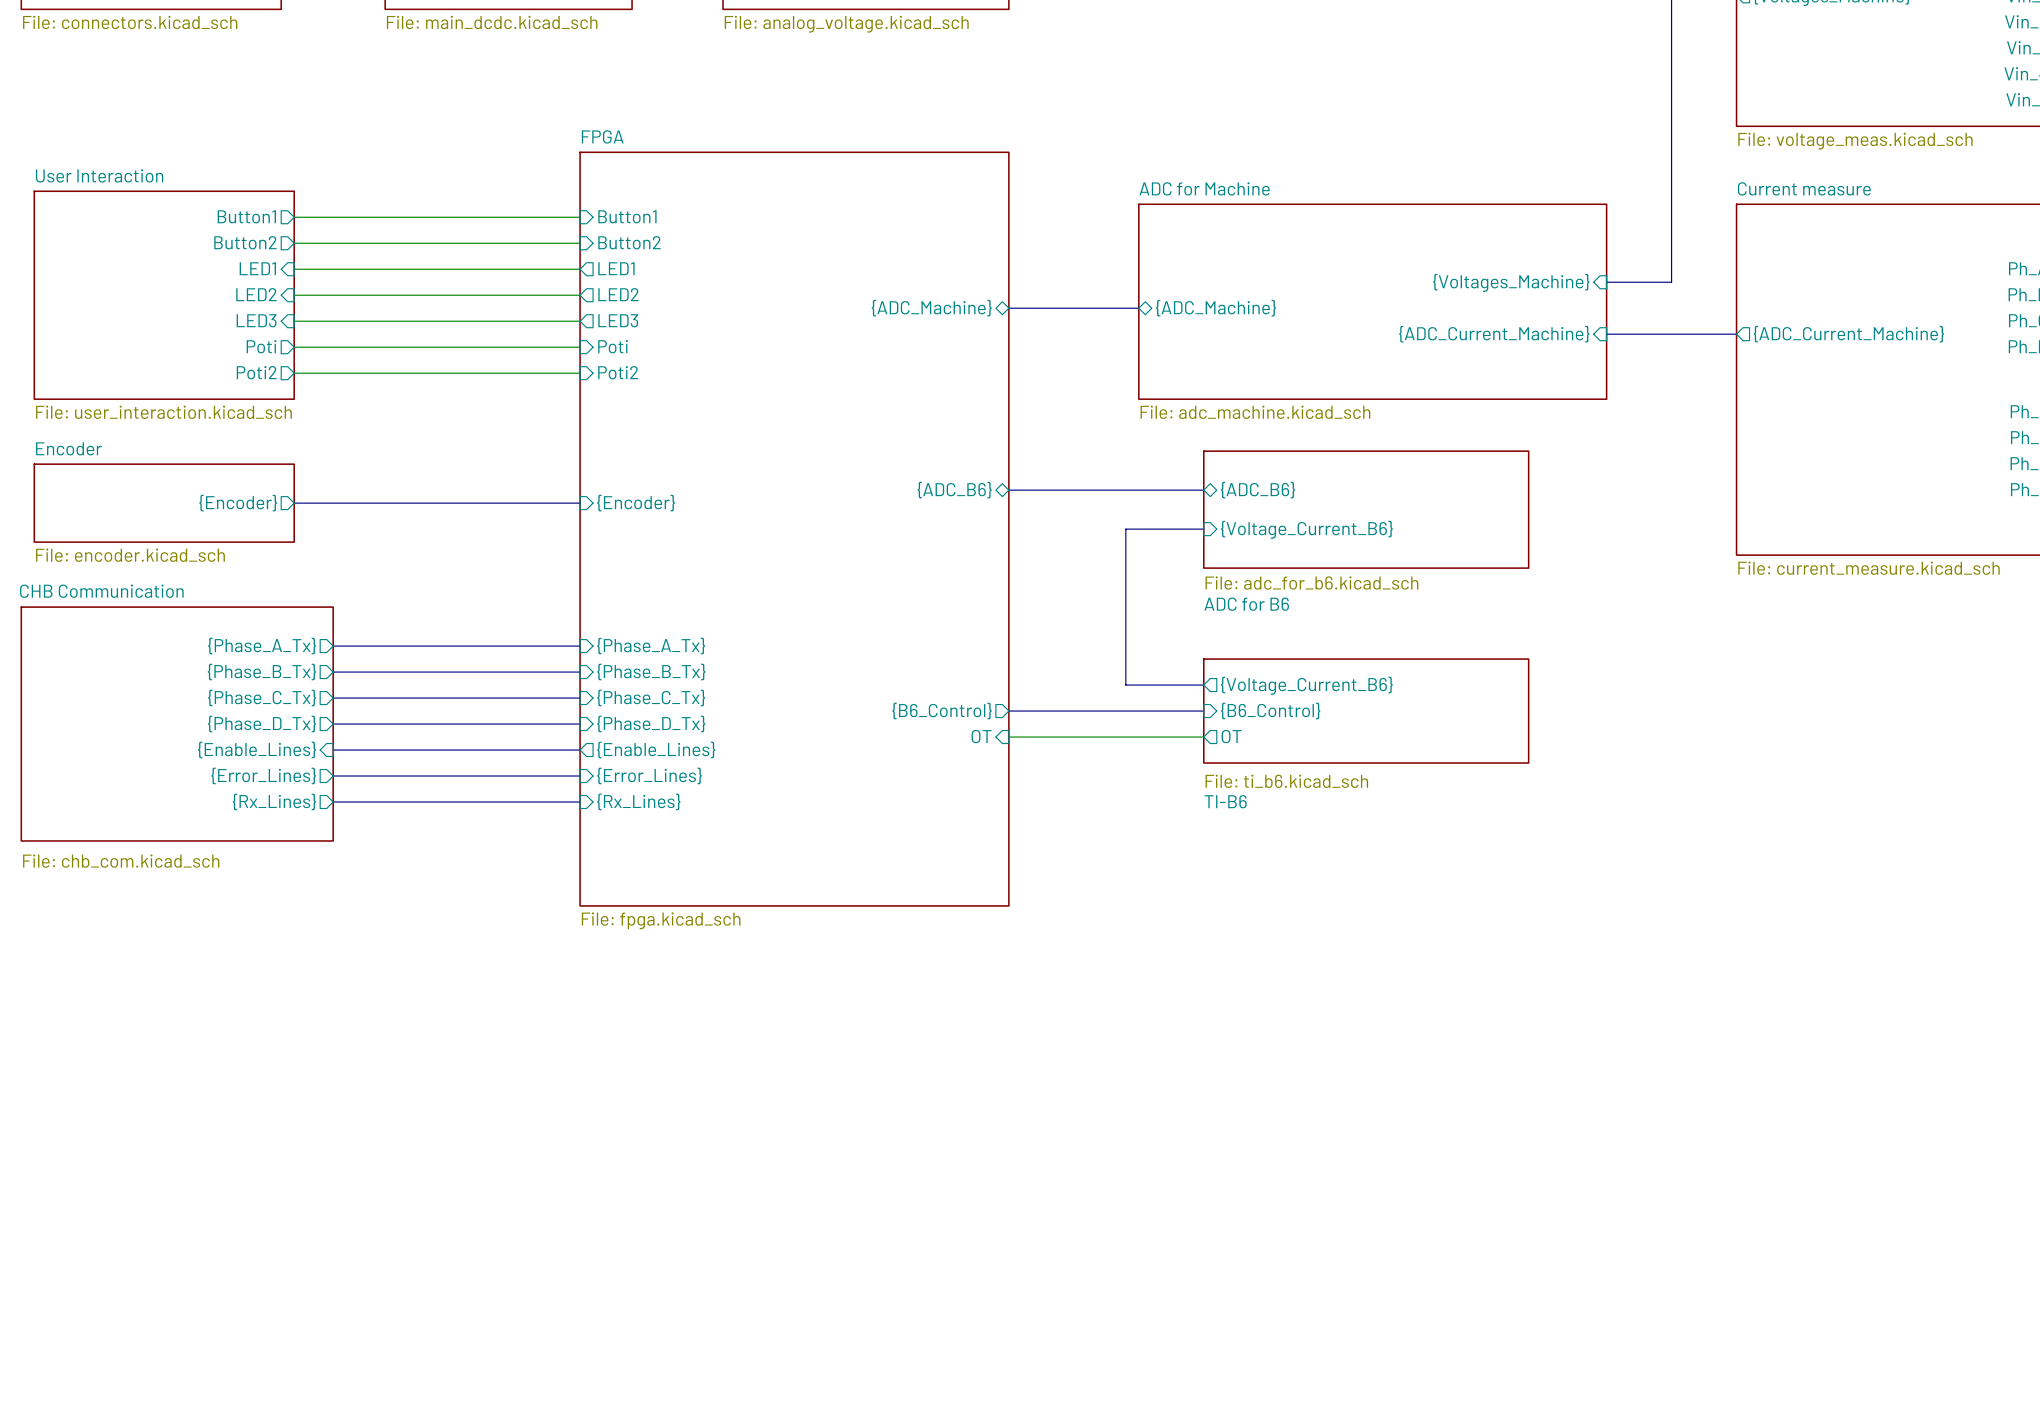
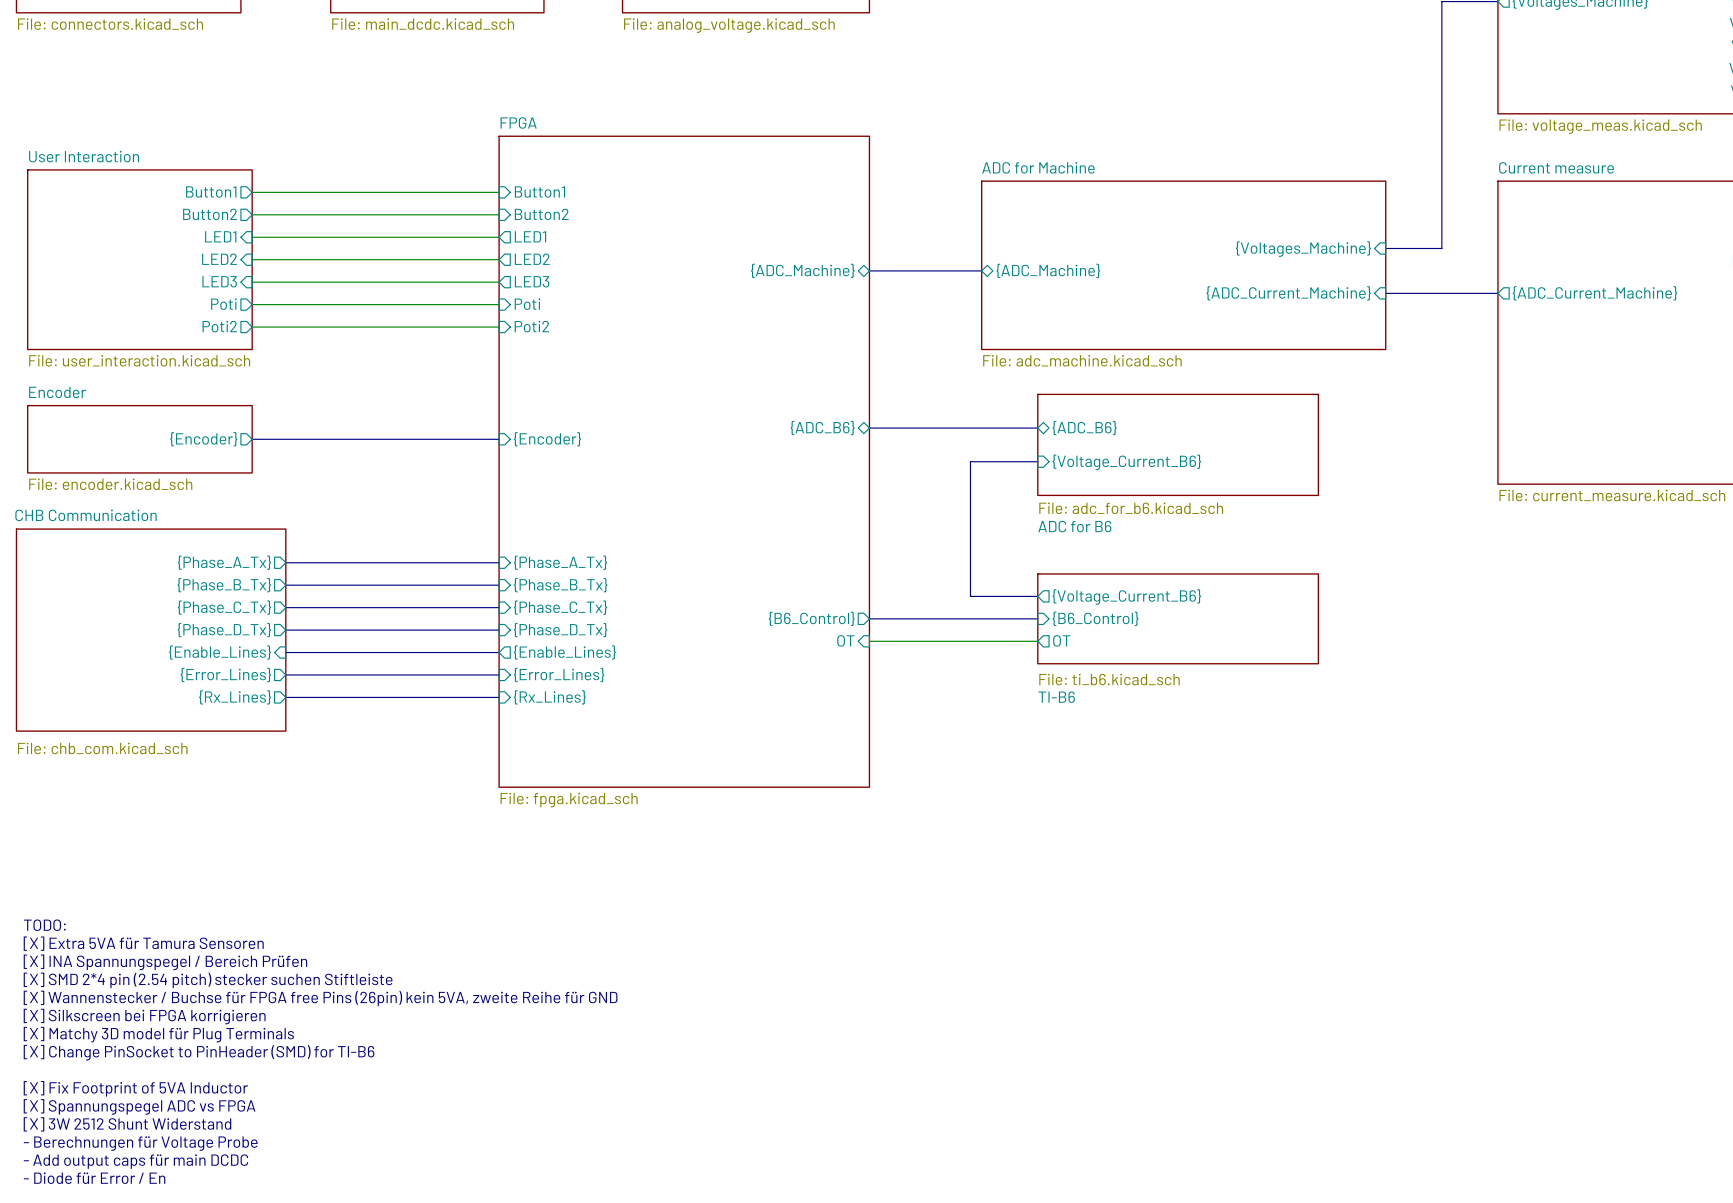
text: none -> TODO: (44, 925)
text: none -> [X] Extra 5VA für Tamura Sensoren (143, 943)
text: none -> [X] INA Spannungspegel / Bereich Prüfen (165, 962)
text: none -> [X] SMD 2*4 pin (2.54 pitch) stecker suchen Stiftleiste (208, 980)
text: none -> [X] Wannenstecker / Buchse für FPGA free Pins (26pin) kein 5VA, zweite Reihe für GND (320, 998)
text: none -> [X] Silkscreen bei FPGA korrigieren (144, 1016)
text: none -> [X] Matchy 3D model für Plug Terminals (158, 1034)
text: none -> [X] Change PinSocket to PinHeader (SMD) for TI-B6 (199, 1052)
text: none -> [X] Fix Footprint of 5VA Inductor (135, 1088)
text: none -> [X] Spannungspegel ADC vs FPGA (139, 1106)
text: none -> [X] 3W 2512 Shunt Widerstand (127, 1124)
text: none -> - Berechnungen für Voltage Probe (140, 1143)
text: none -> - Add output caps für main DCDC (135, 1161)
text: none -> - Diode für Error / En (94, 1178)

